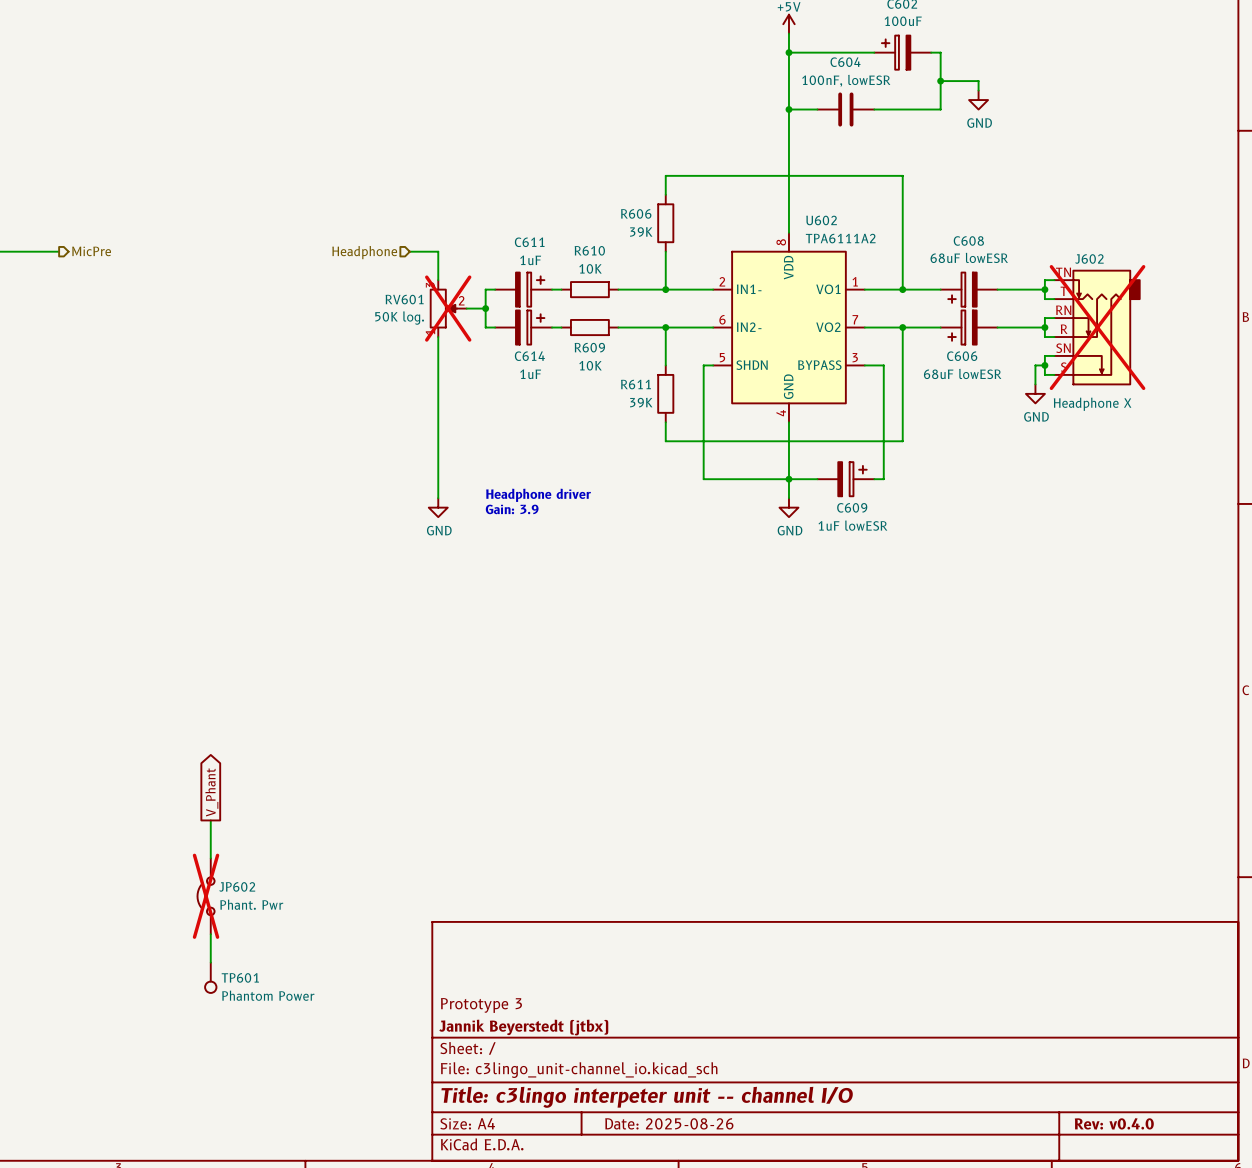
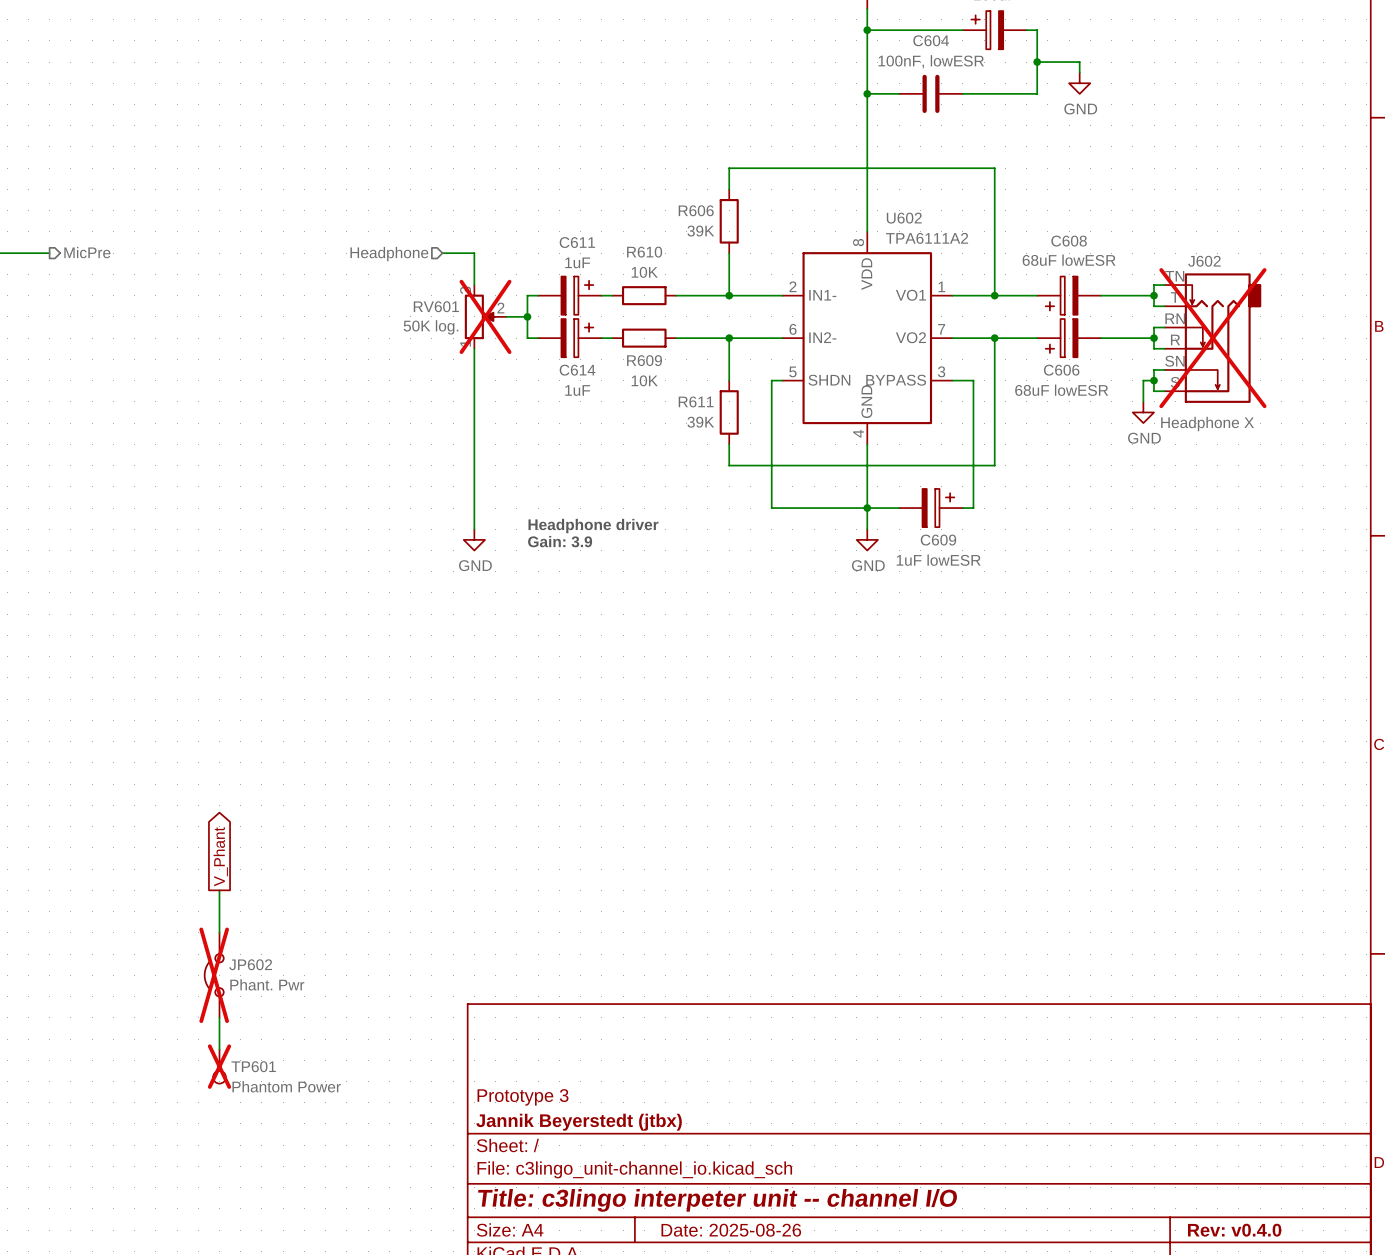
TP601 do-not-place cross: none -> (219, 1066)

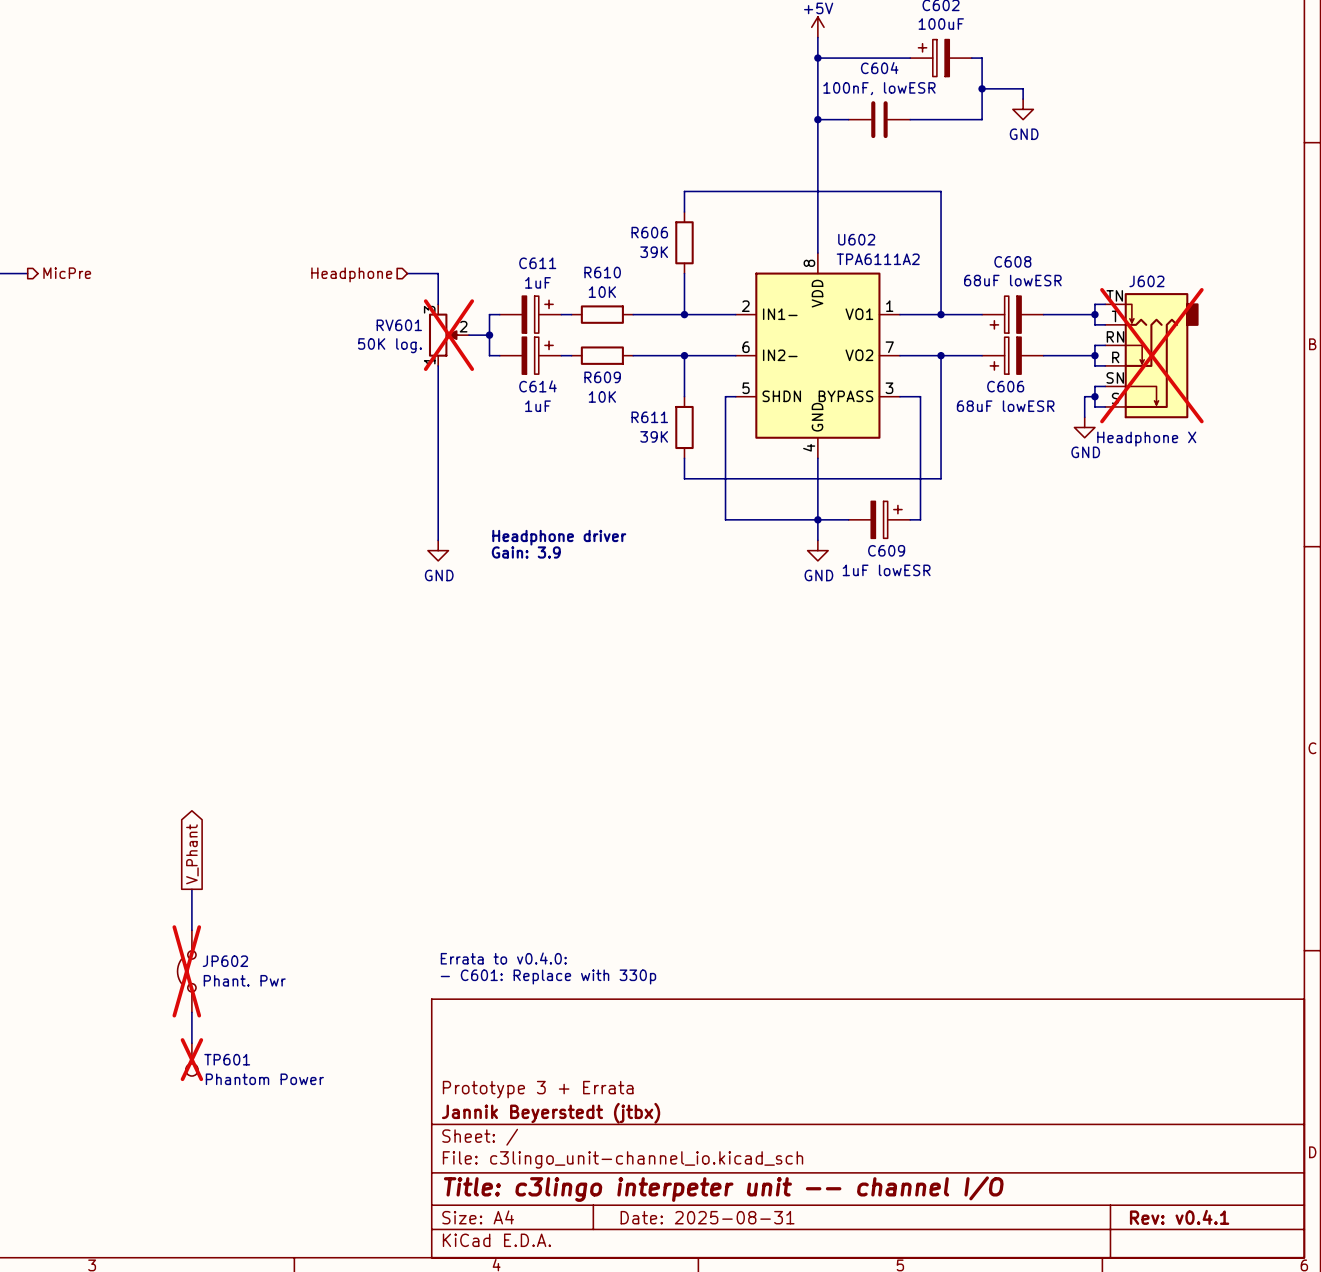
text: none -> Errata to v0.4.0: (503, 958)
text: none -> - C601: Replace with 330p (548, 976)
title block: Prototype 3 (523, 1097) -> Prototype 3 + Errata (538, 1089)
title block: Date: 2025-08-26 (731, 1230) -> Date: 2025-08-31 (707, 1217)
title block: Rev: v0.4.0 (1234, 1230) -> Rev: v0.4.1 (1179, 1217)

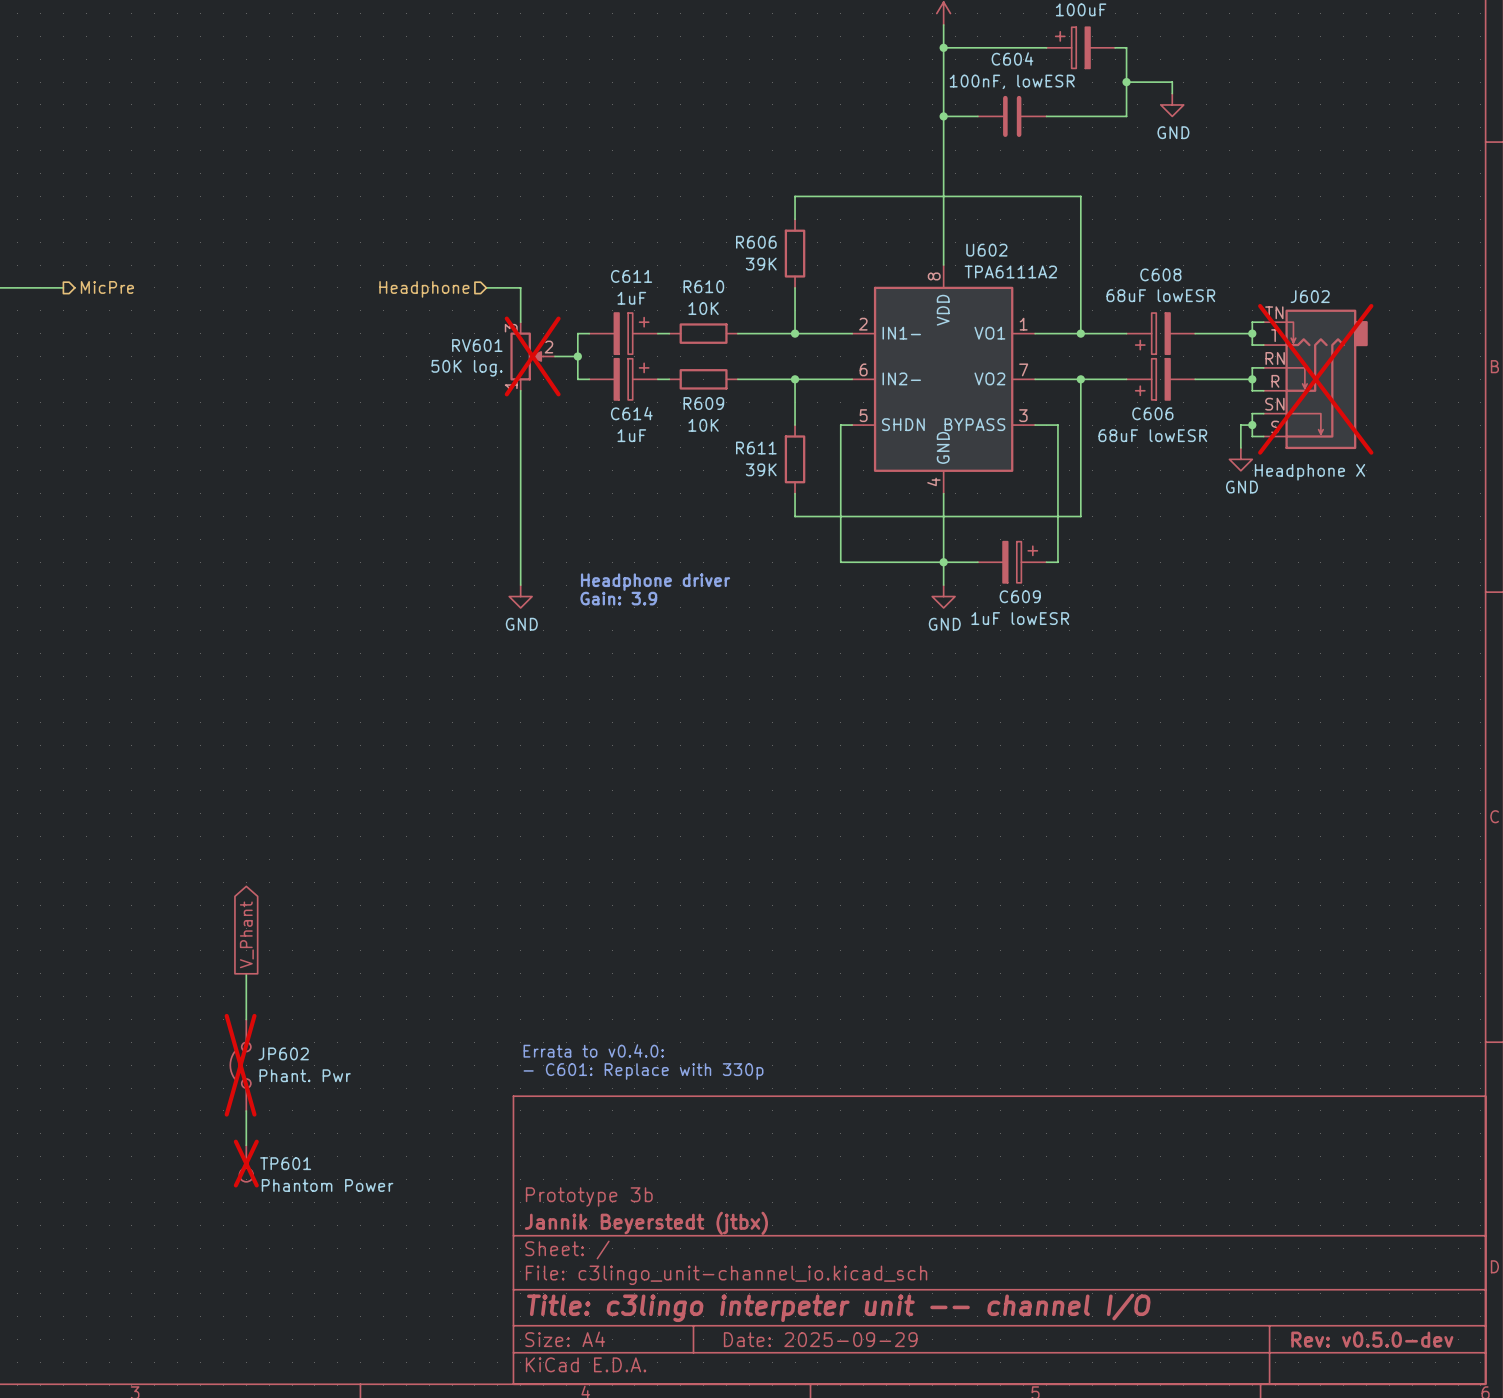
title block: Prototype 3 + Errata (538, 1089) -> Prototype 3b (589, 1196)
title block: Date: 2025-08-31 (707, 1217) -> Date: 2025-09-29 (820, 1339)
title block: Rev: v0.4.1 (1179, 1217) -> Rev: v0.5.0-dev (1372, 1339)

